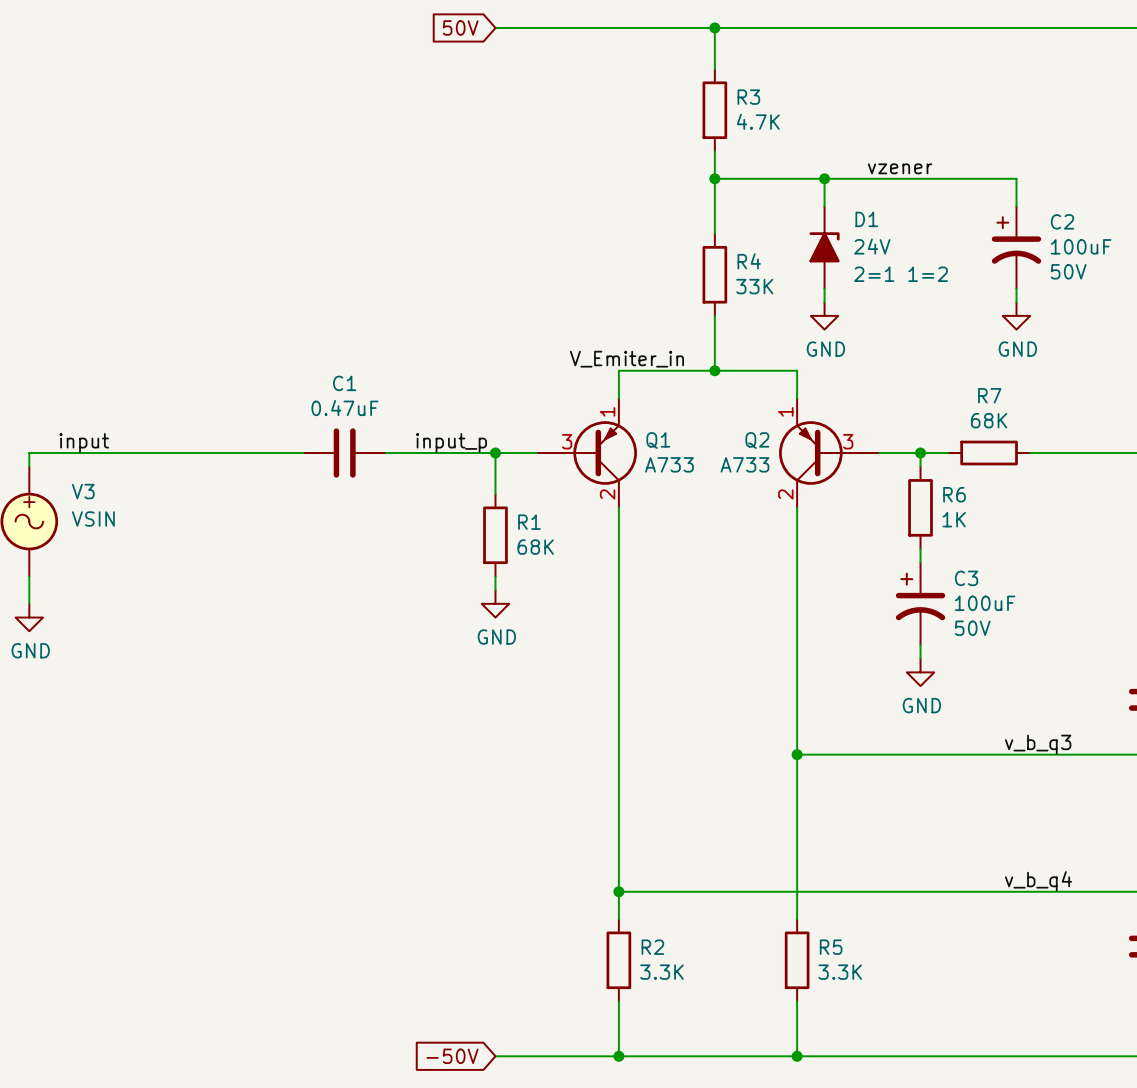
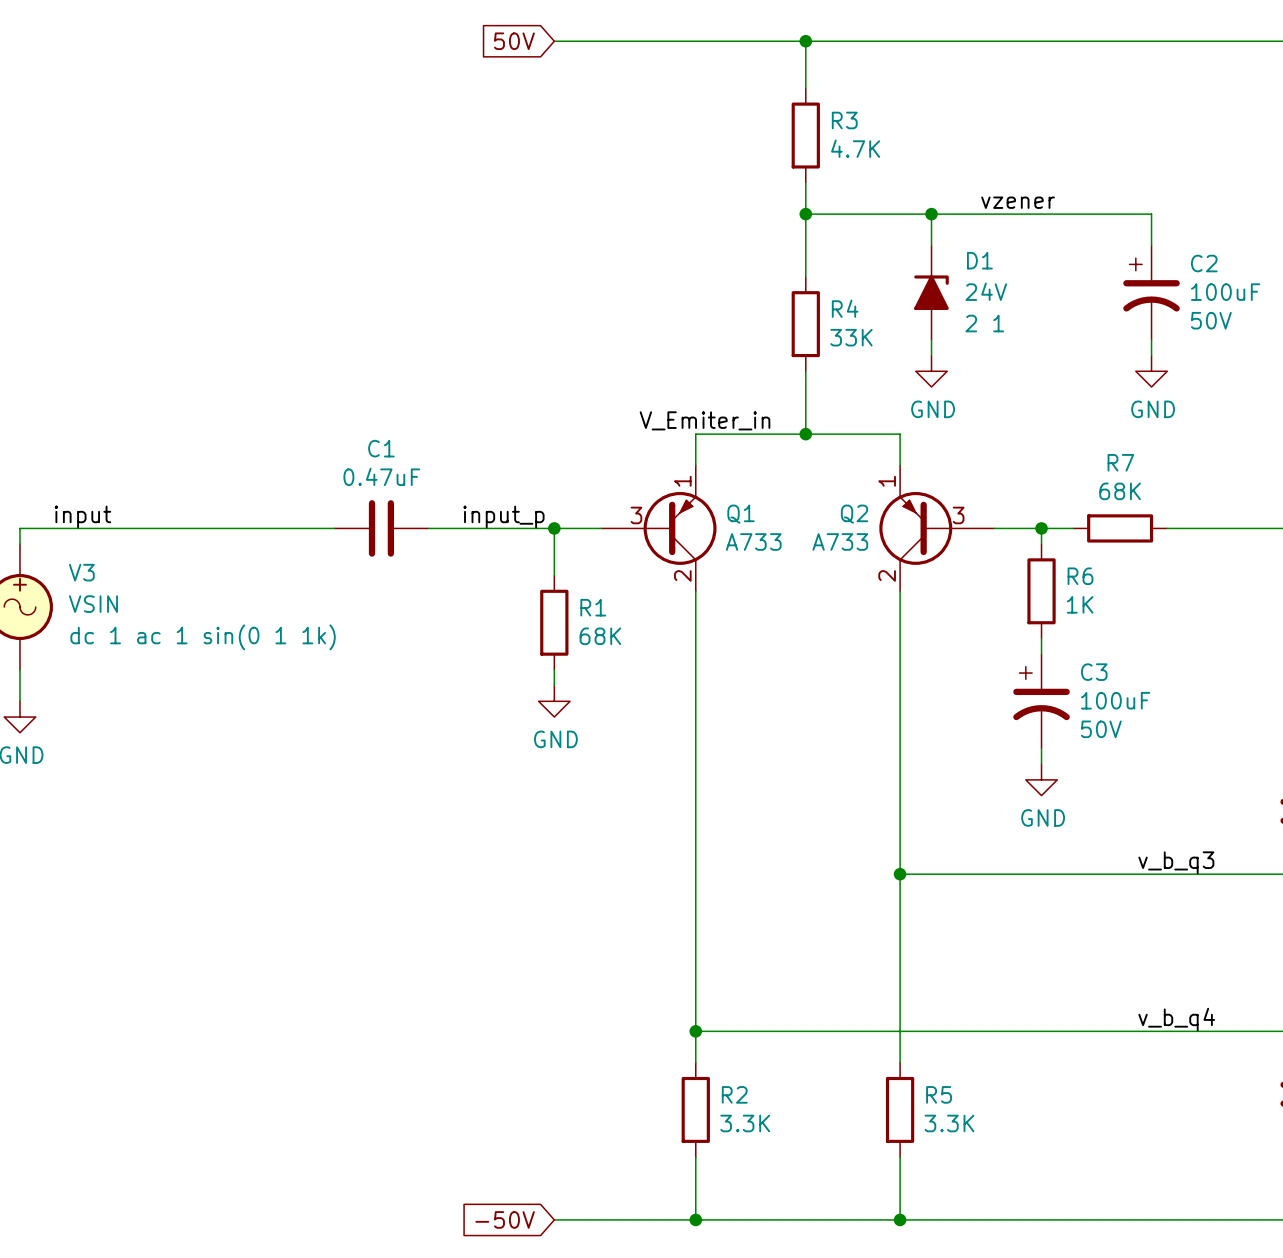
D1 text: none -> 2 1 (984, 323)
D1 text: 2=1 1=2 (901, 274) -> none
V3 text: none -> dc 1 ac 1 sin(0 1 1k) (203, 637)

